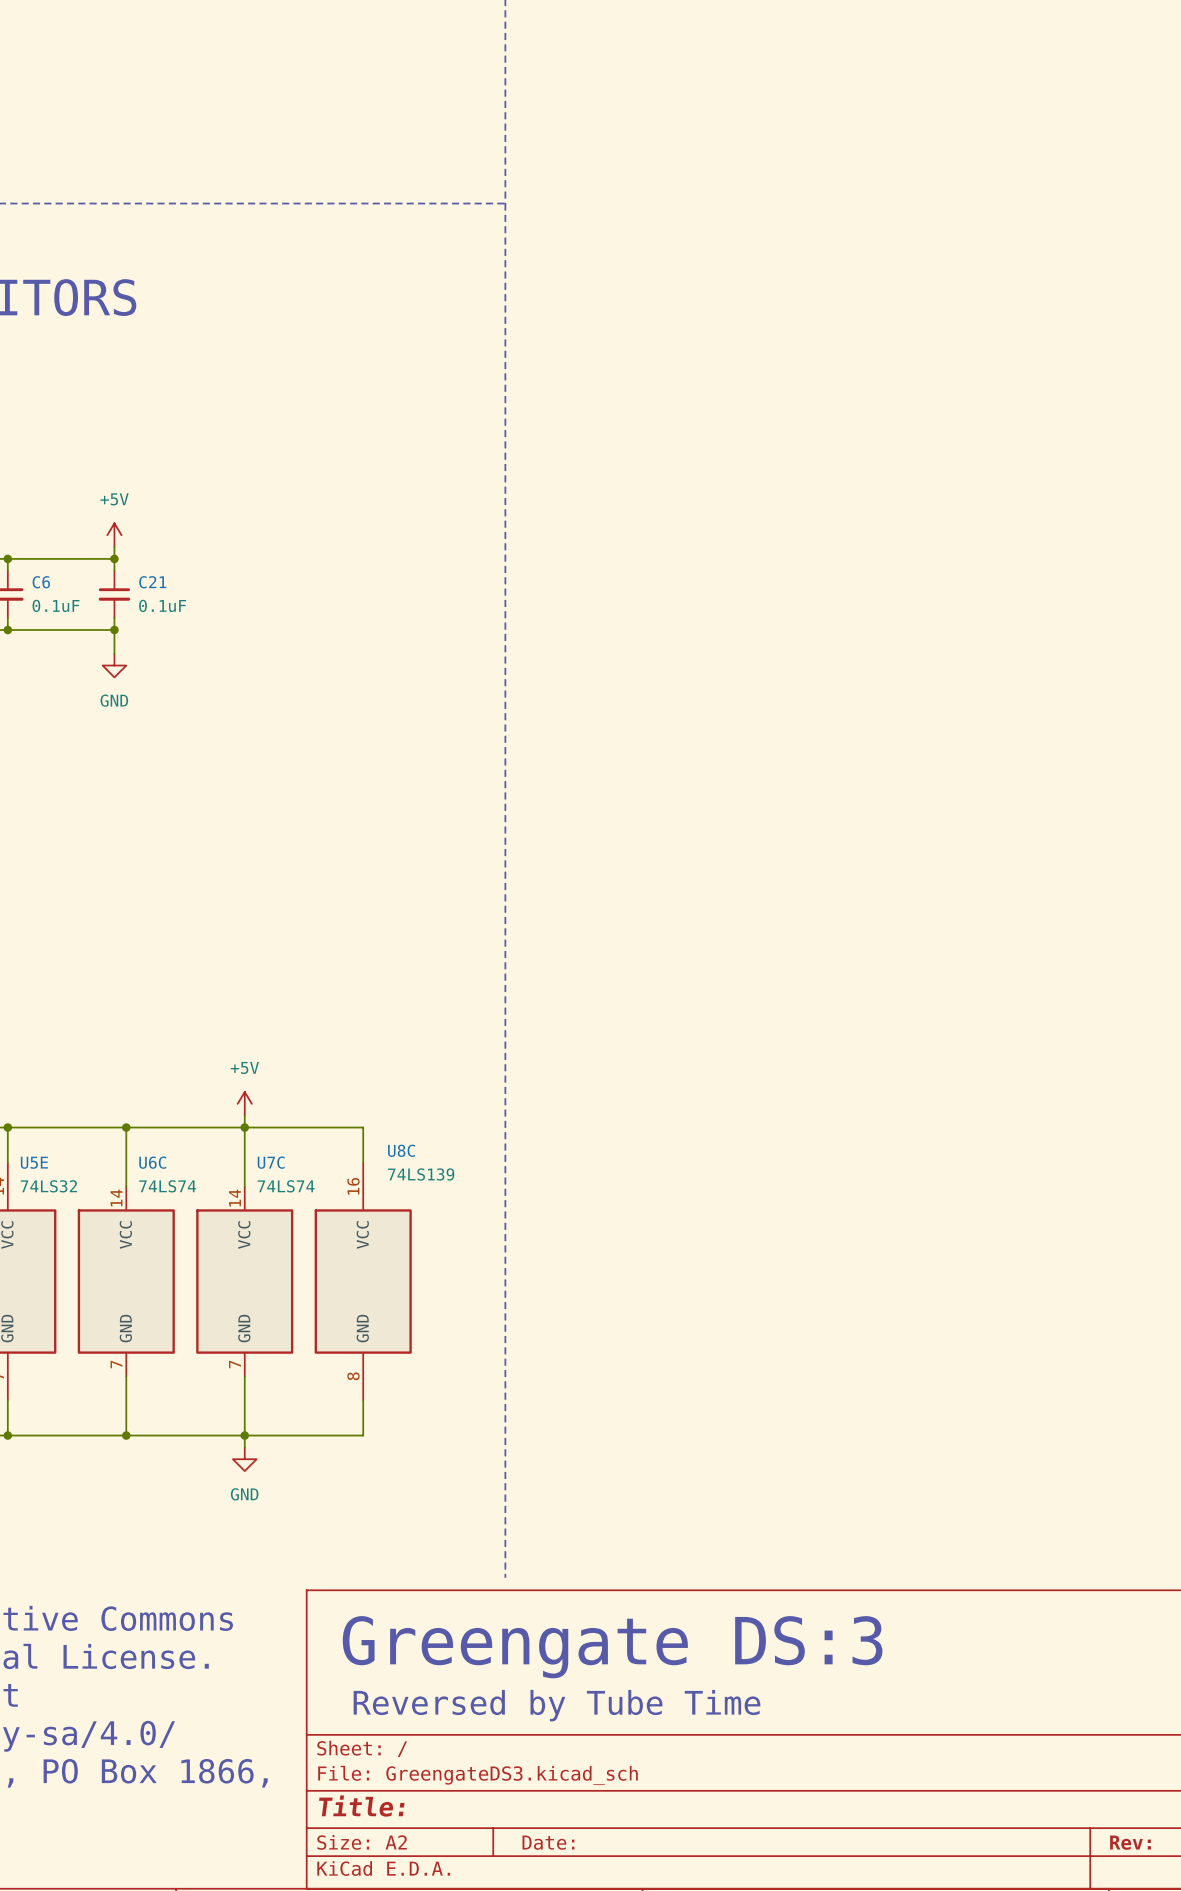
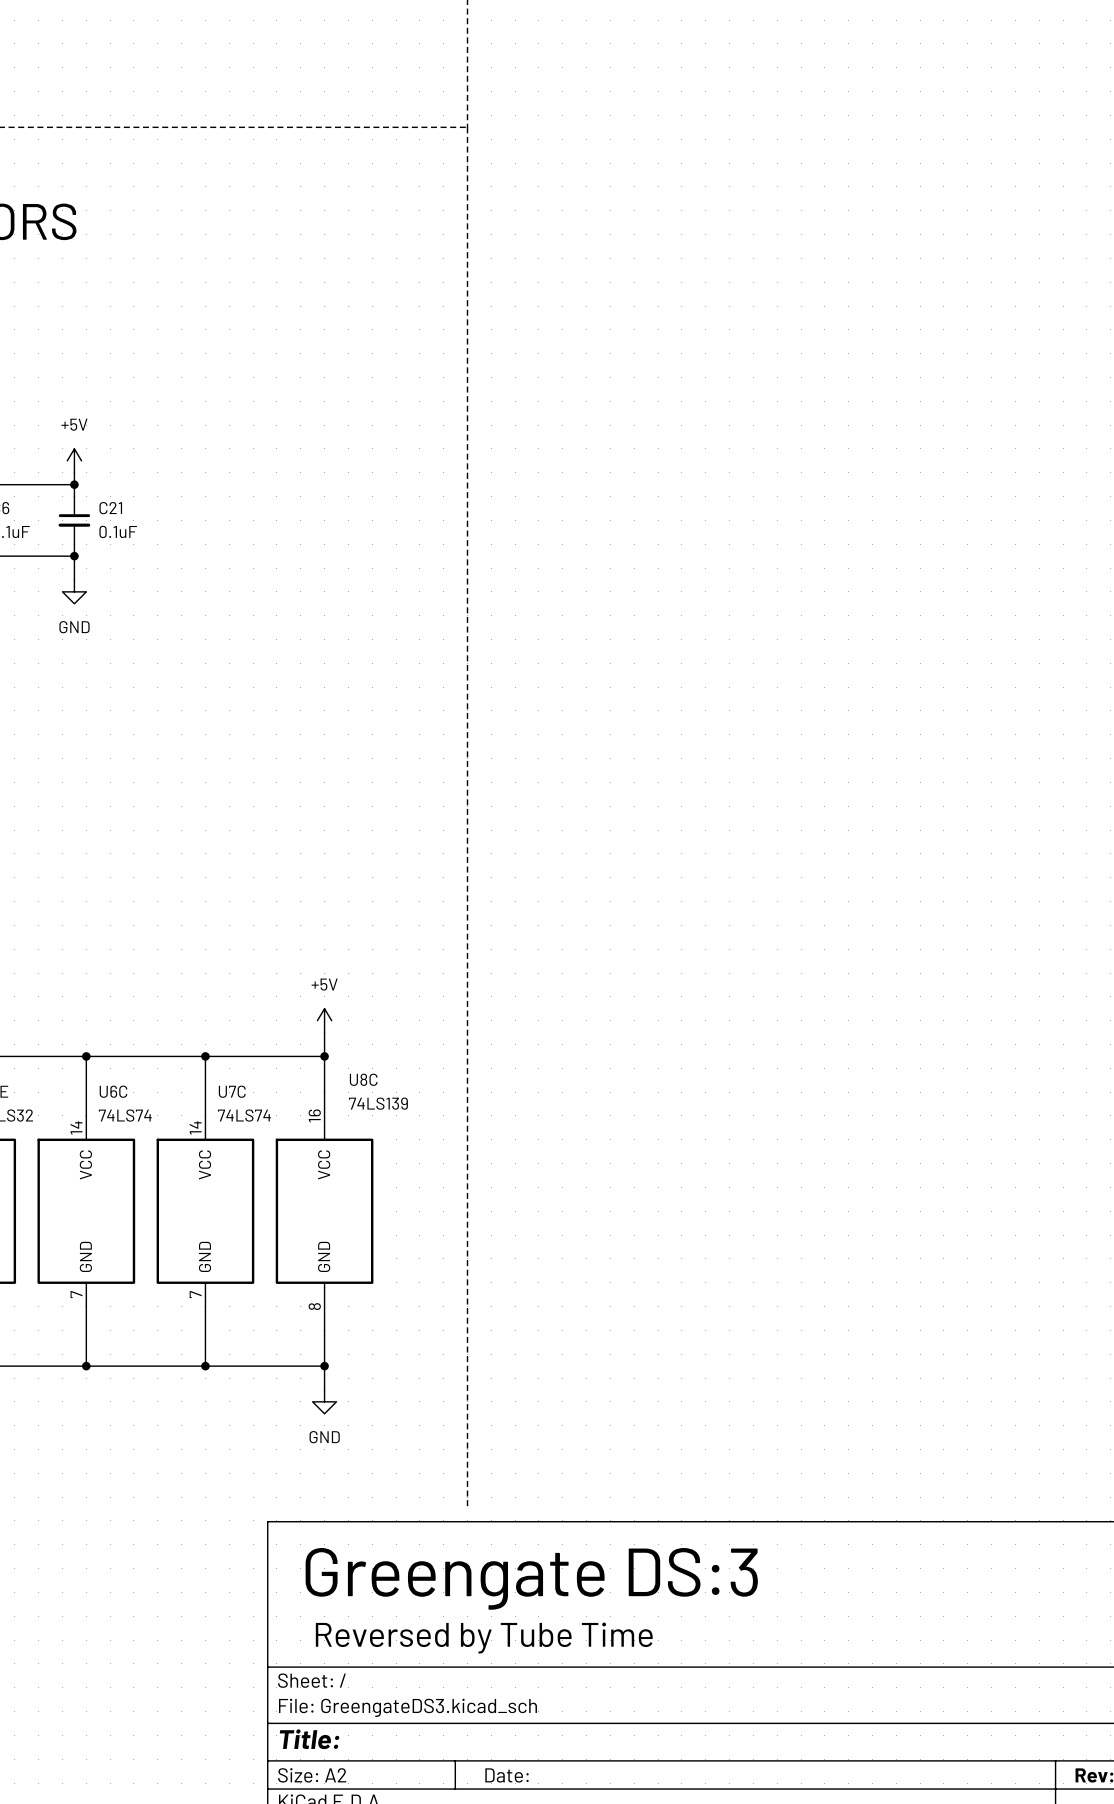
power symbol position: +5V (244, 1103) -> +5V (324, 1020)
wire: none -> (324, 1032) (324, 1056)
wire: (244, 1115) (244, 1127) -> none
junction: none -> (324, 1056)
wire: (244, 1435) (244, 1447) -> none
wire: none -> (324, 1366) (324, 1389)
junction: none -> (324, 1366)
power symbol position: GND (244, 1459) -> GND (324, 1401)

